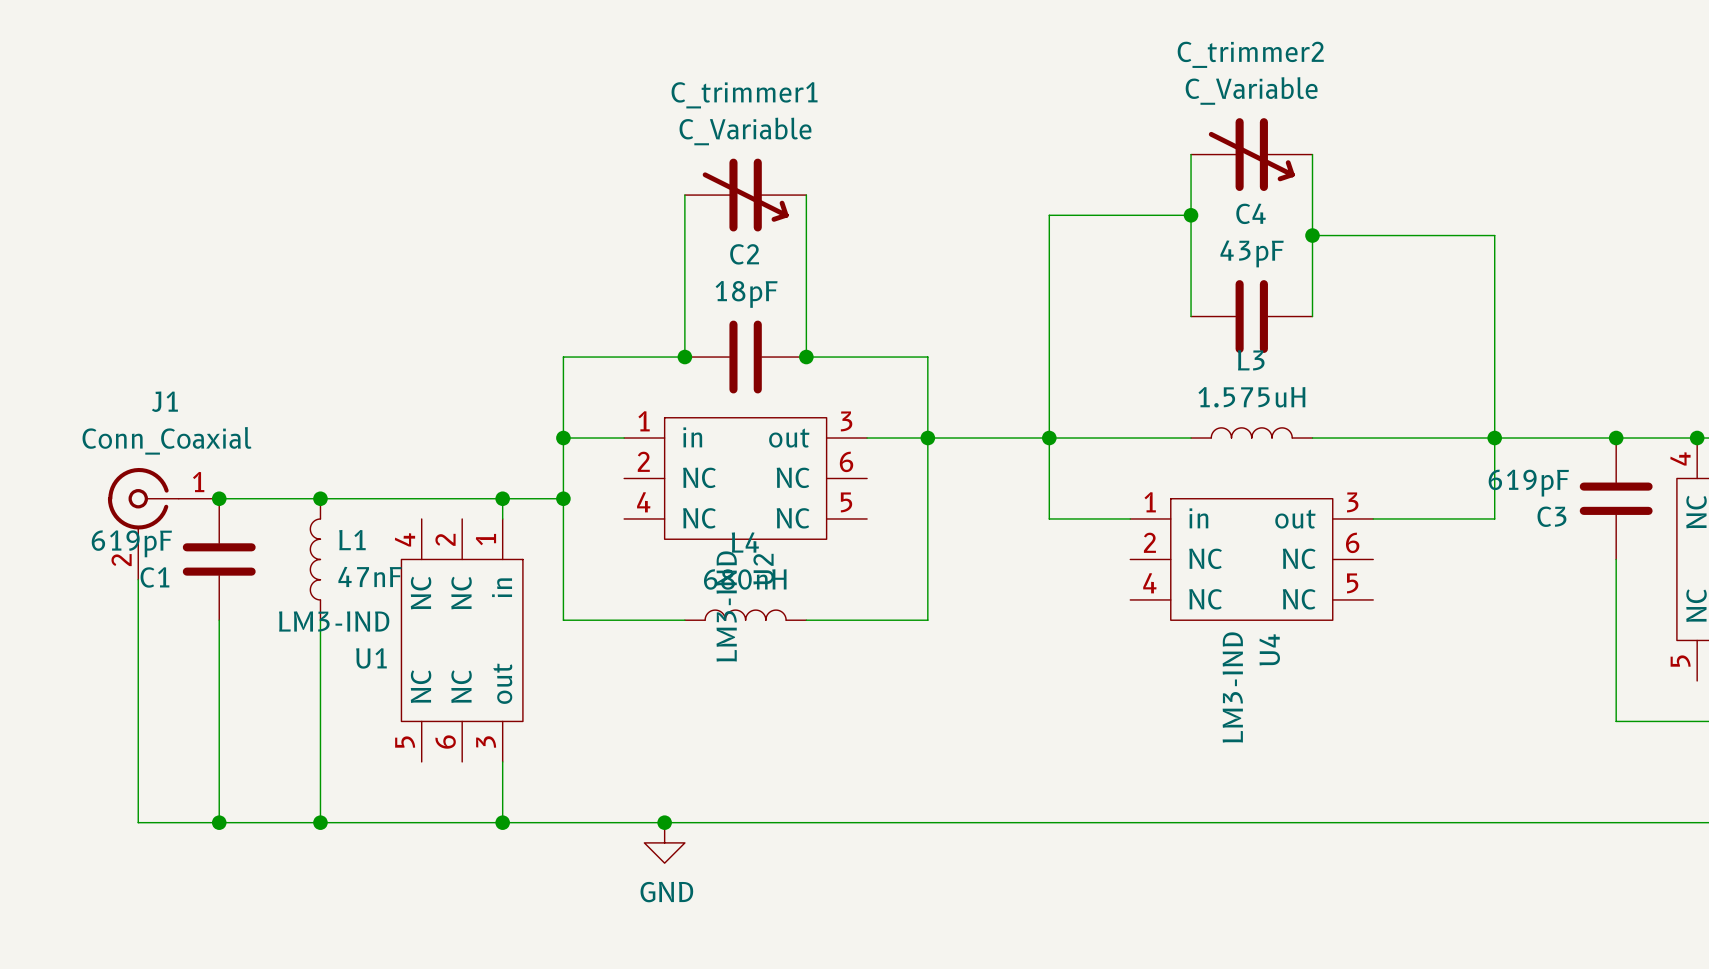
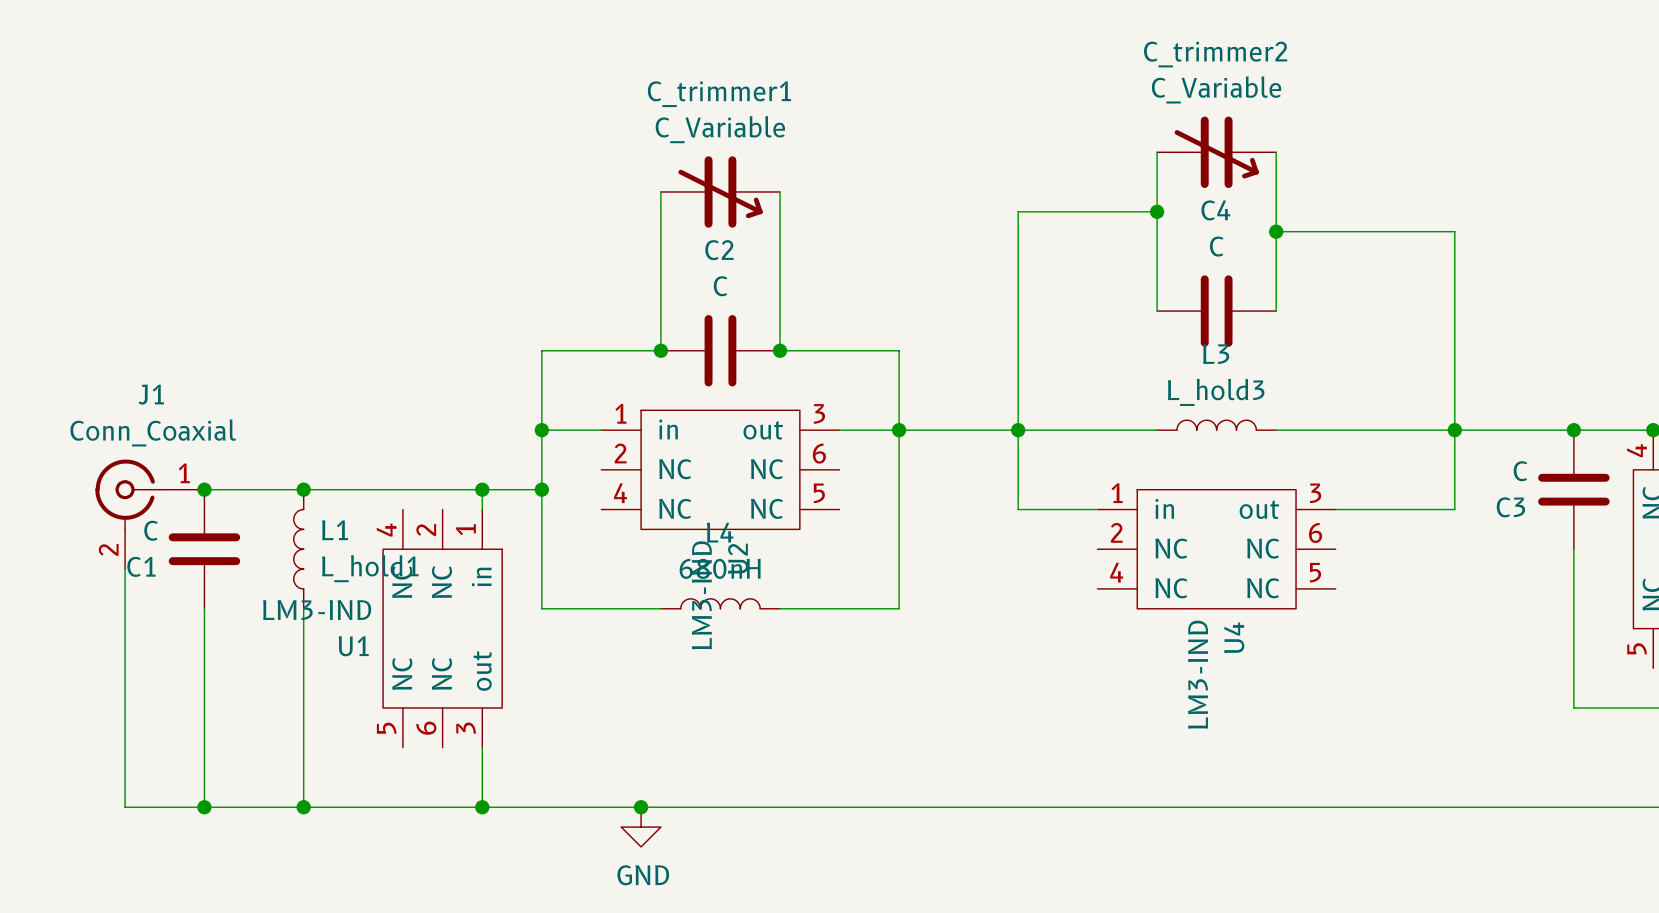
C4 value: 43pF (1252, 253) -> C (1216, 246)
C2 value: 18pF (746, 294) -> C (720, 286)
L3 value: 1.575uH (1251, 397) -> L_hold3 (1216, 392)
C3 value: 619pF (1528, 483) -> C (1520, 471)
C1 value: 619pF (131, 543) -> C (151, 530)
L1 value: 47nF (370, 576) -> L_hold1 (370, 568)

